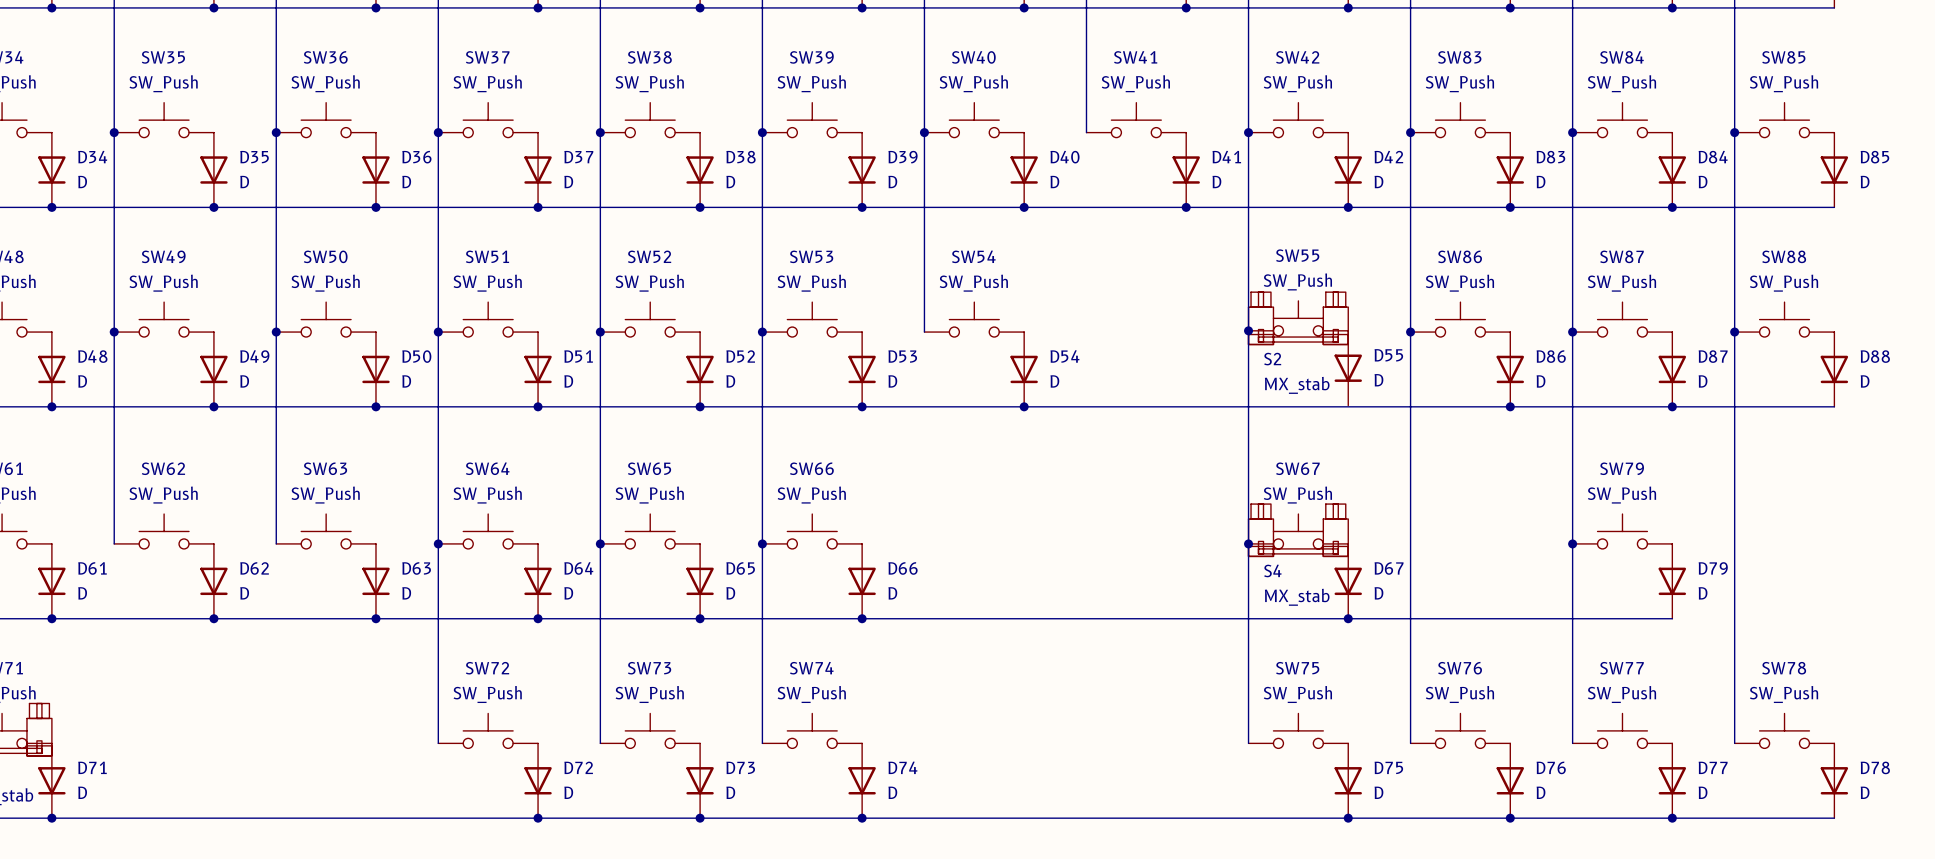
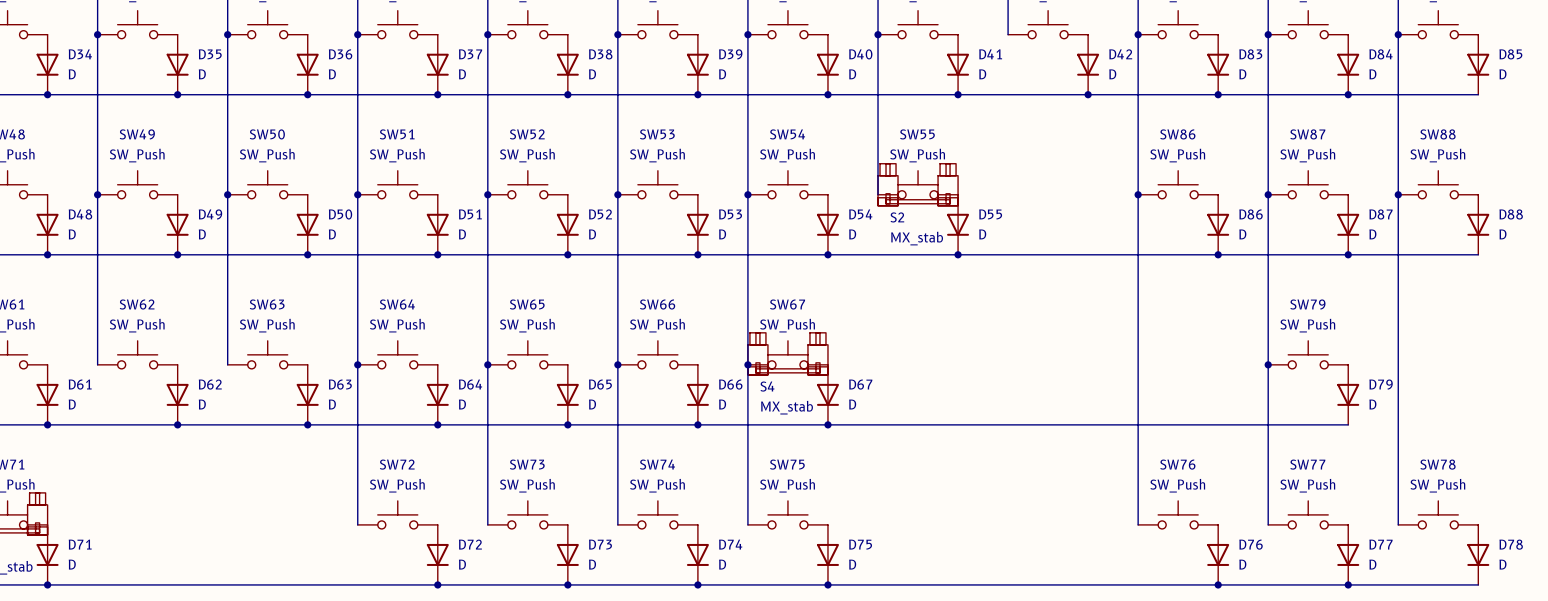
wire: none -> (878, 34) (878, 194)
junction: none -> (878, 34)
wire: (1248, 132) (1248, 743) -> none
junction: (1248, 132) -> none
S2 position: (1298, 318) -> (918, 184)
SW55 position: (1298, 318) -> (918, 184)
junction: (1248, 330) -> none
wire: none -> (747, 194) (747, 524)
junction: none -> (747, 194)
D55 position: (1348, 368) -> (958, 224)
junction: none -> (958, 254)
S4 position: (1298, 530) -> (787, 353)
SW67 position: (1298, 531) -> (787, 354)
junction: none -> (747, 364)
junction: (1248, 543) -> none
D67 position: (1348, 581) -> (827, 394)
junction: none -> (827, 424)
junction: (1348, 618) -> none
SW75 position: (1298, 730) -> (787, 514)
D75 position: (1348, 780) -> (827, 554)
junction: none -> (827, 584)
junction: (1348, 818) -> none

